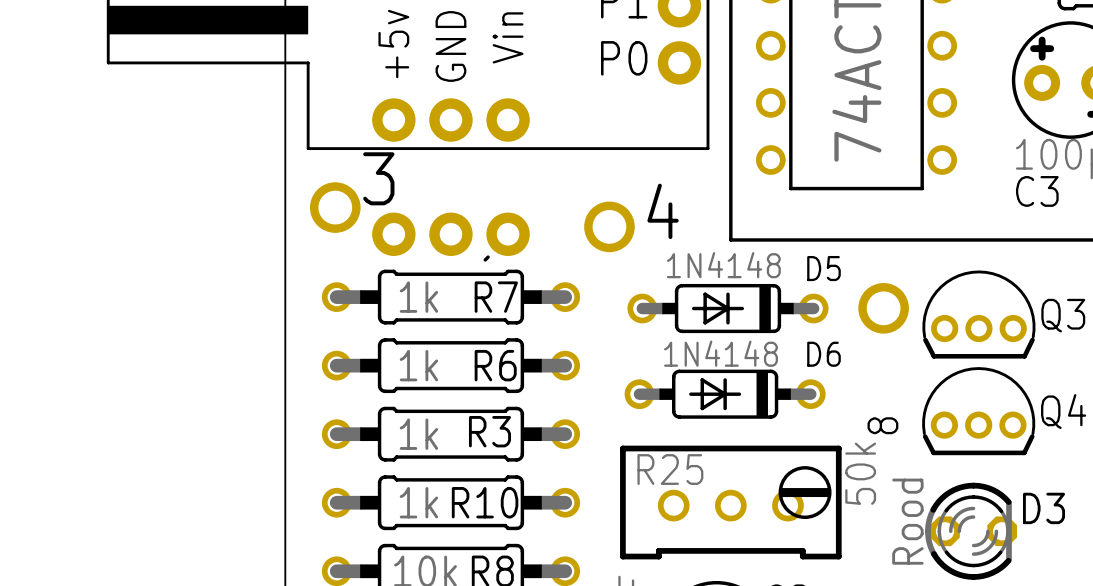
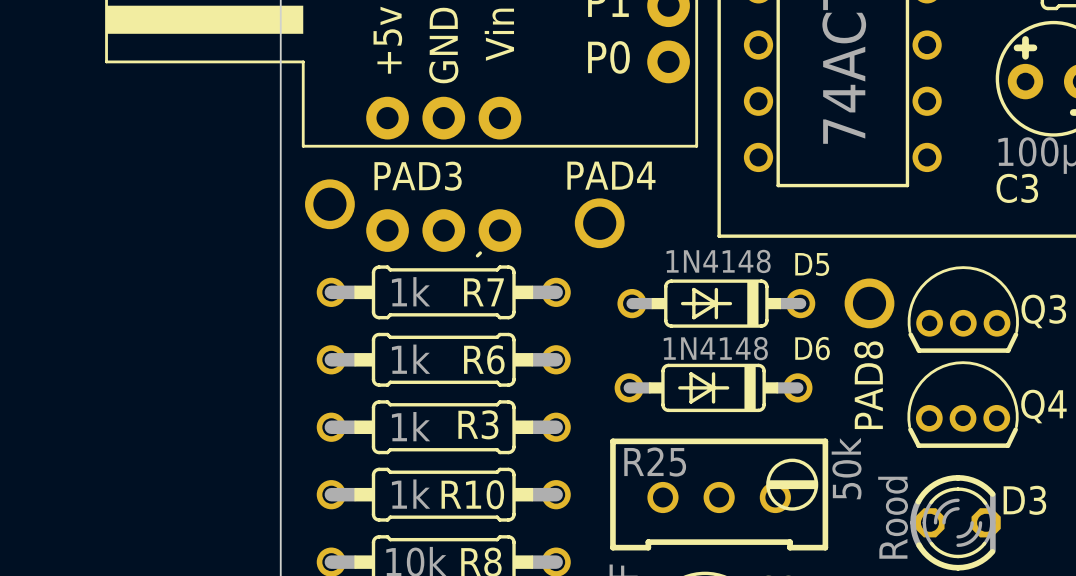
3 name: 3 (378, 178) -> PAD3 (418, 176)
4 name: 4 (663, 211) -> PAD4 (611, 175)
8 name: 8 (882, 425) -> PAD8 (868, 385)

